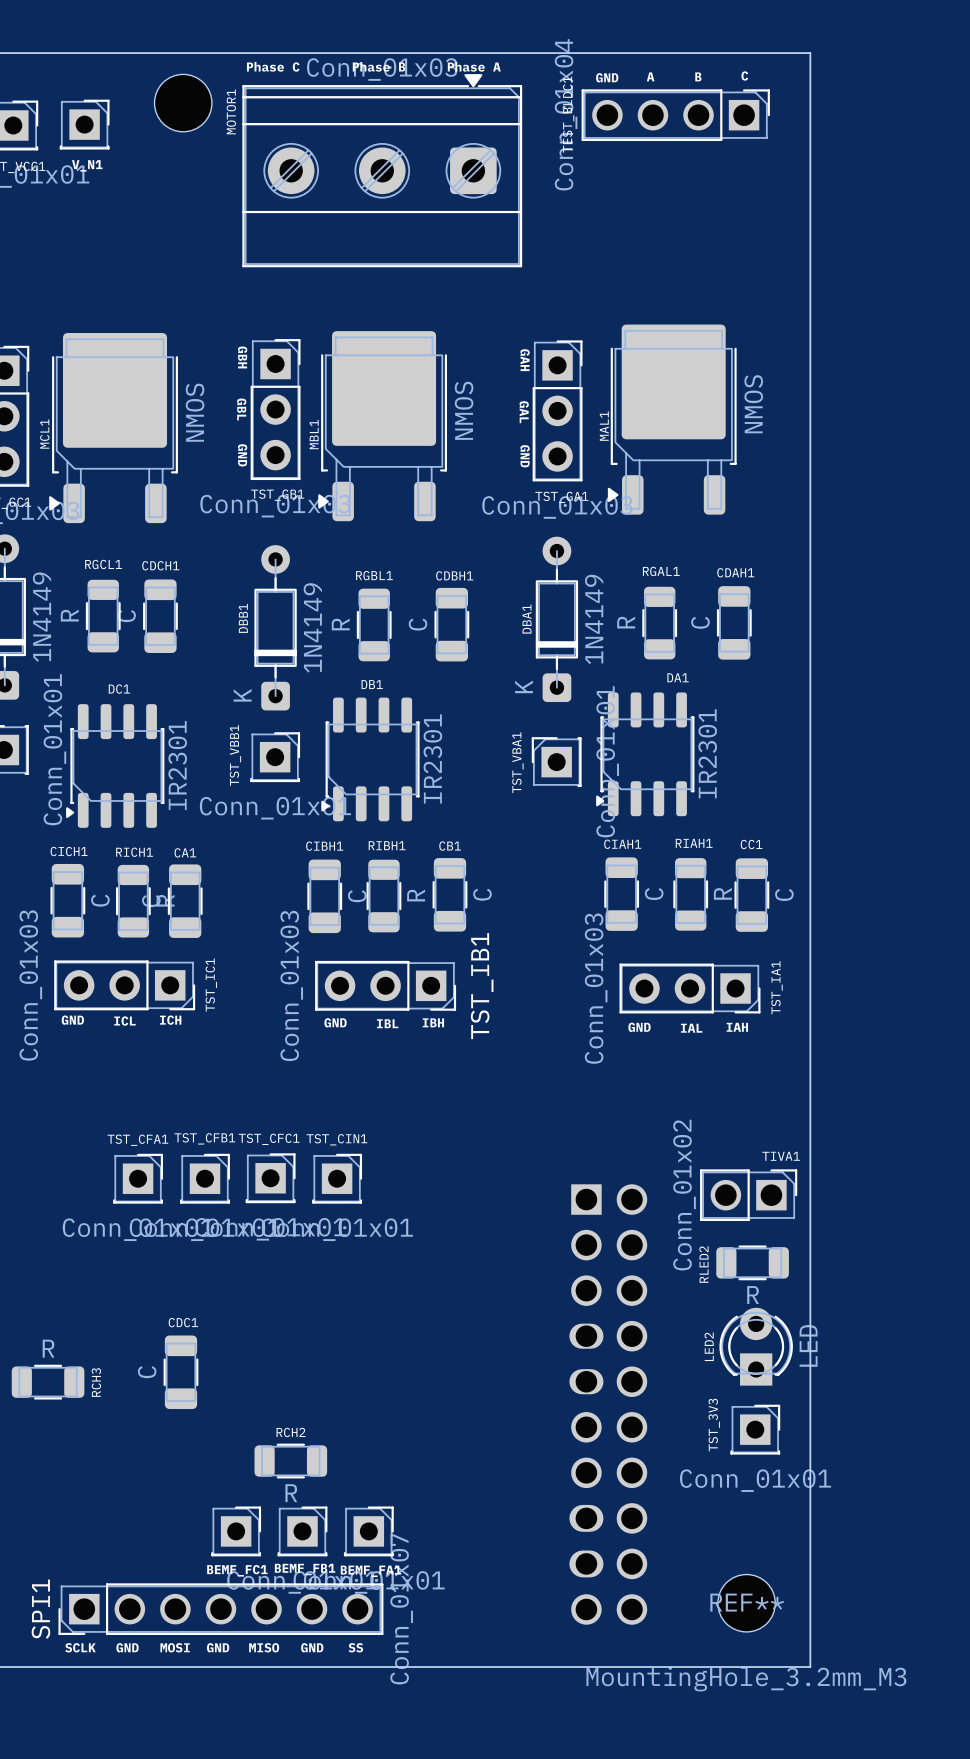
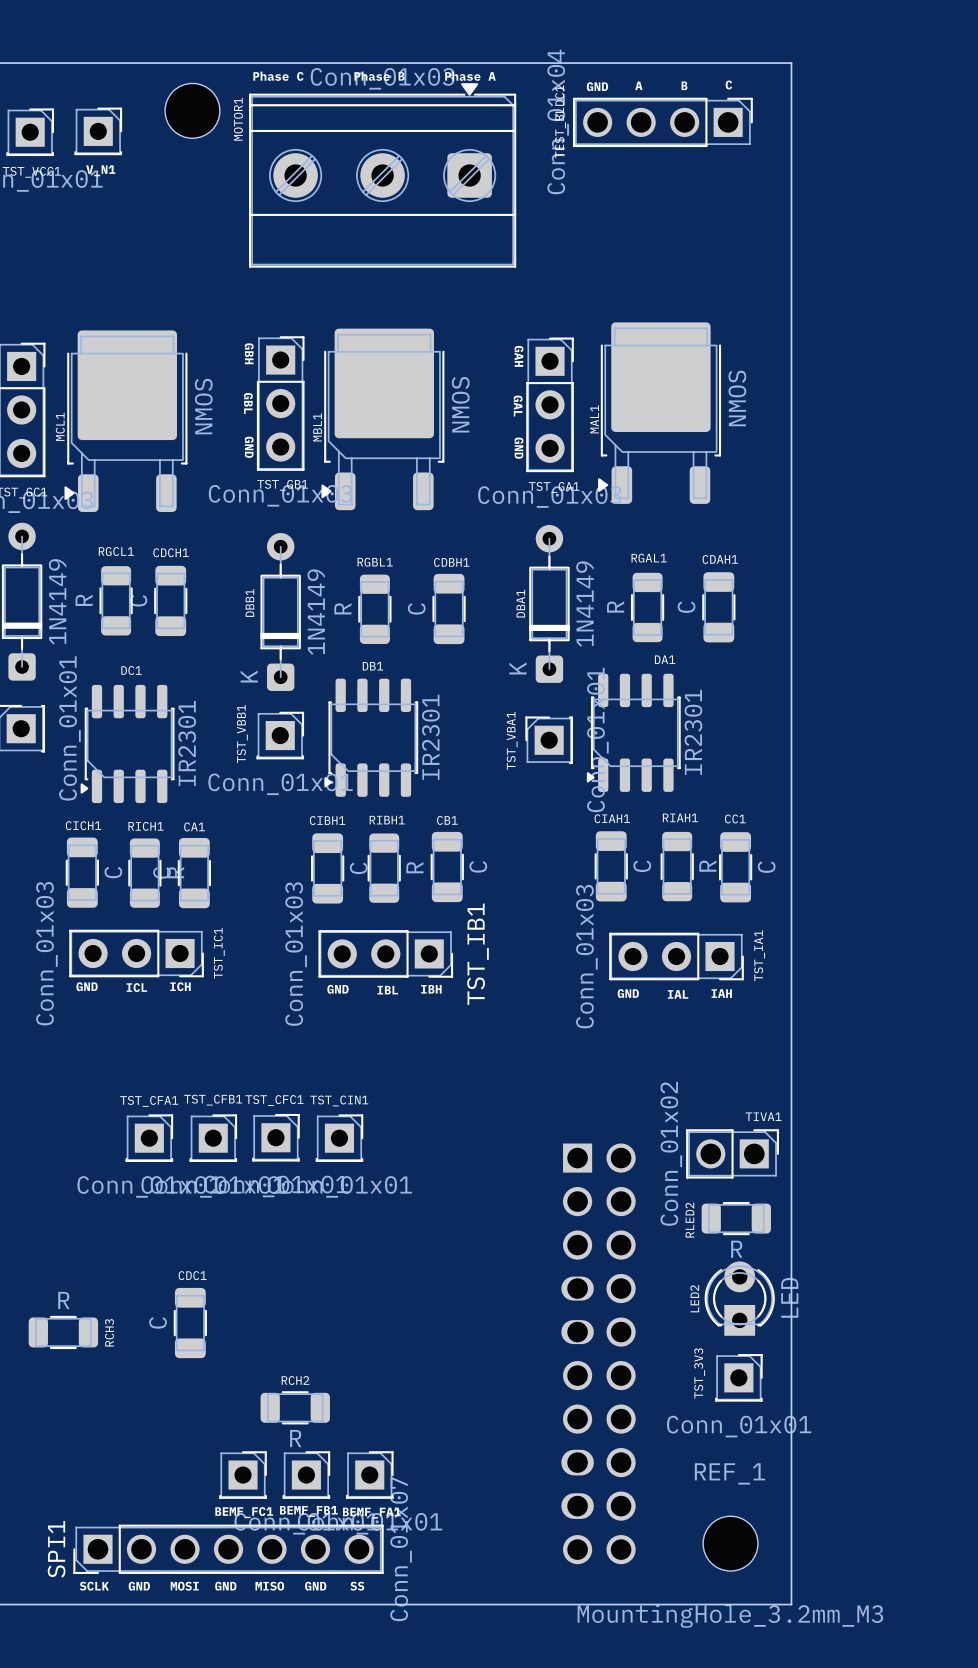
REF** text: none -> REF_1 (729, 1473)
REF** name: REF** (747, 1602) -> none

